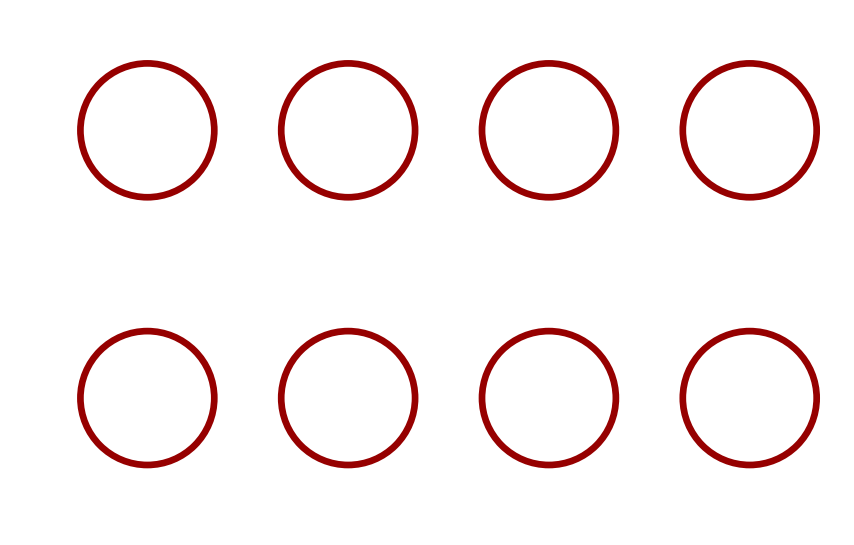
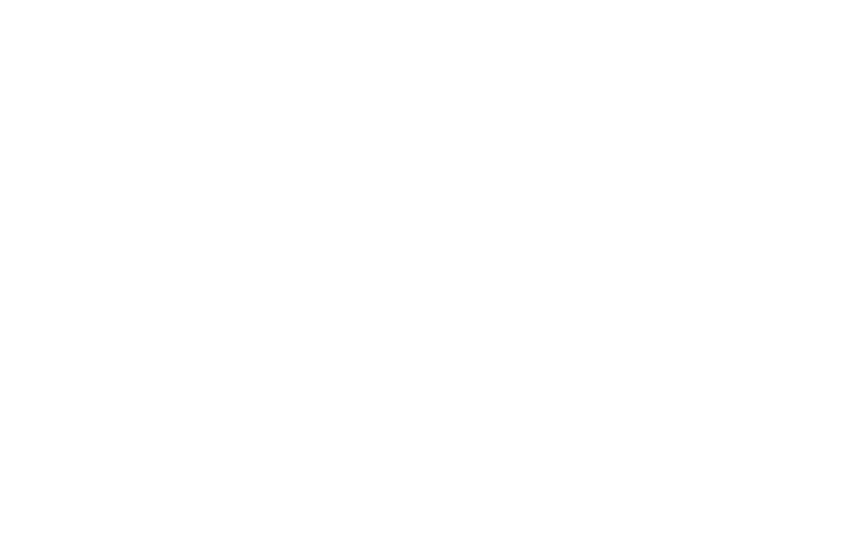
part: (147, 130) -> none
part: (348, 130) -> none
part: (548, 130) -> none
part: (749, 130) -> none
part: (147, 398) -> none
part: (348, 398) -> none
part: (548, 398) -> none
part: (749, 398) -> none

